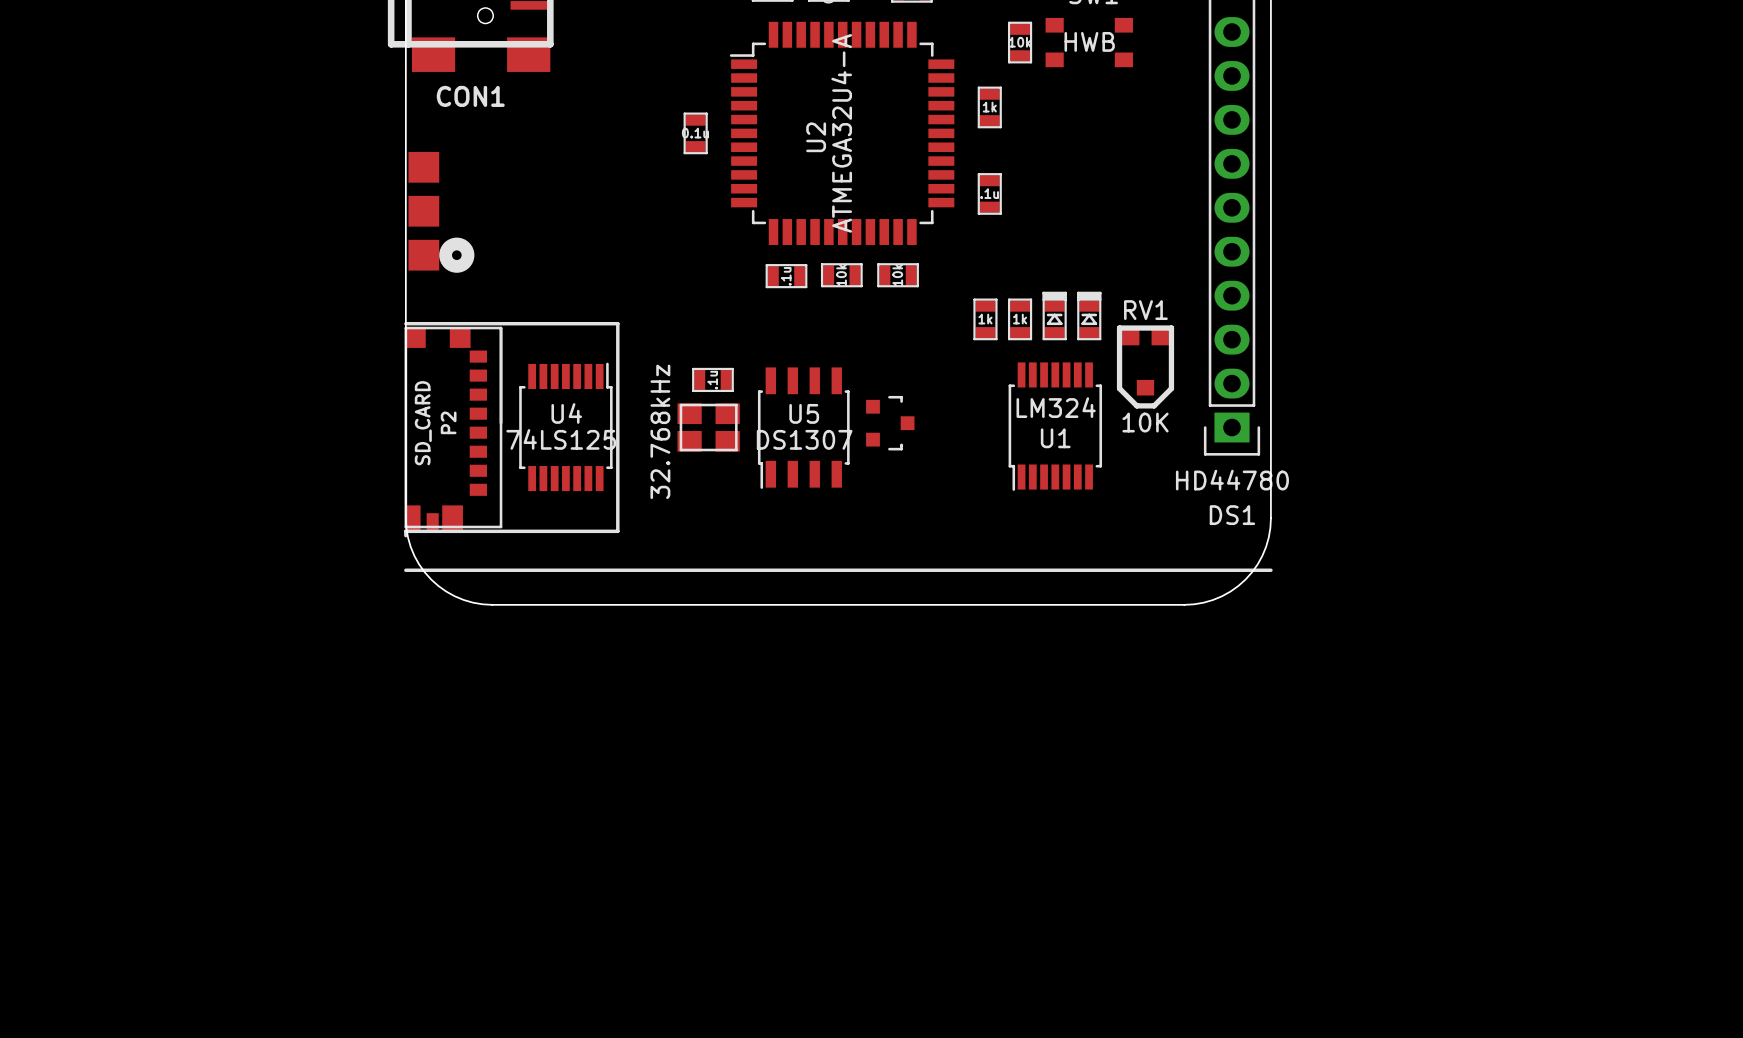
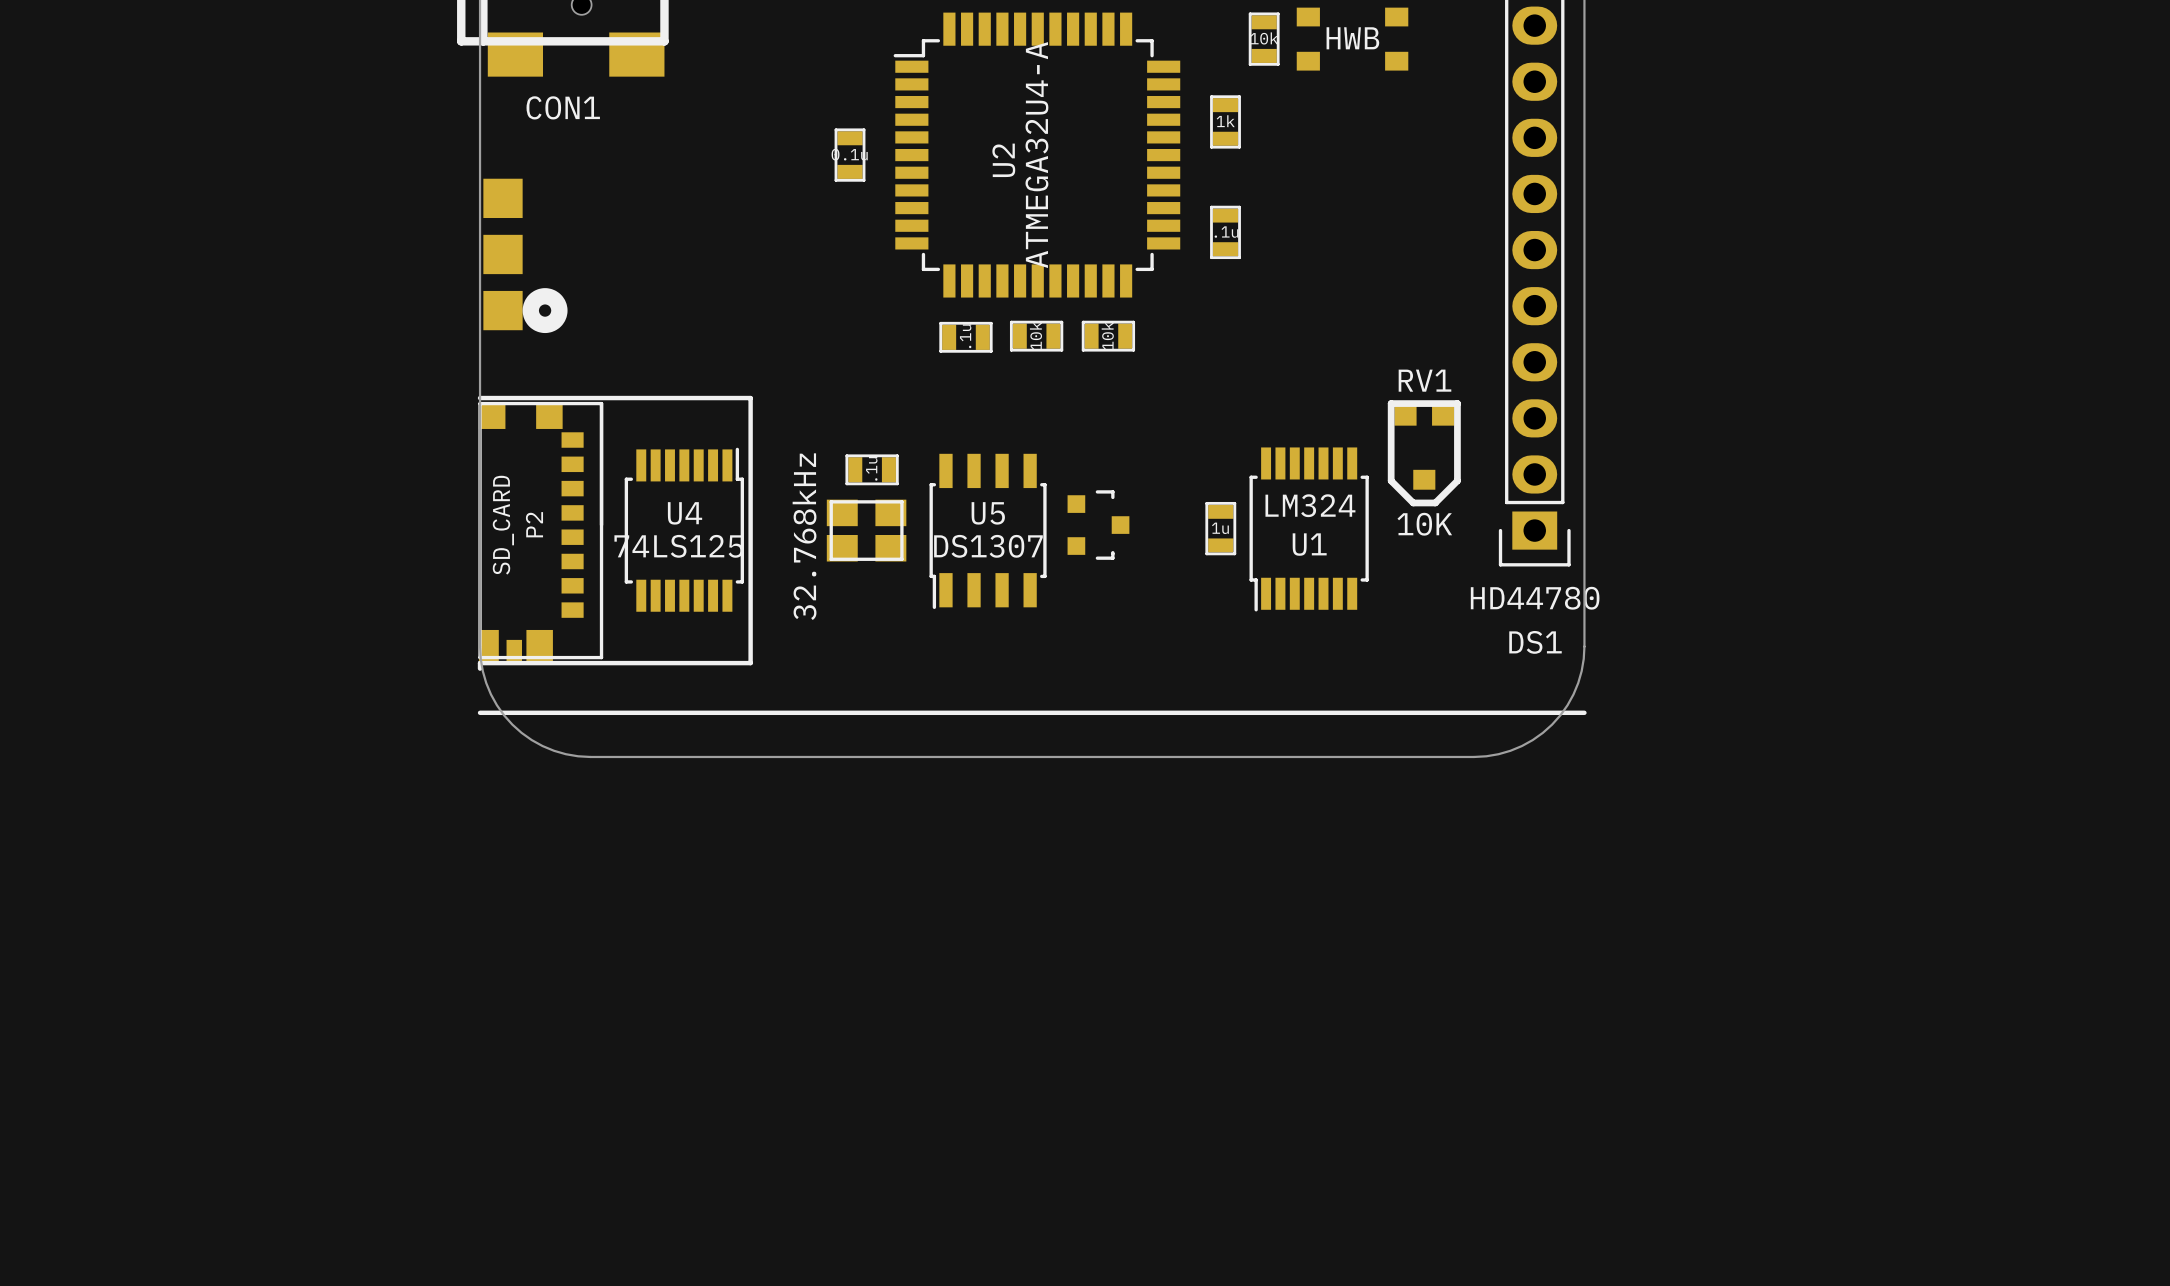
part: (1054, 315) -> none
part: (1089, 315) -> none
part: 1k (985, 319) -> none
part: 1k (1020, 319) -> none
part: none -> 1u (1220, 528)

